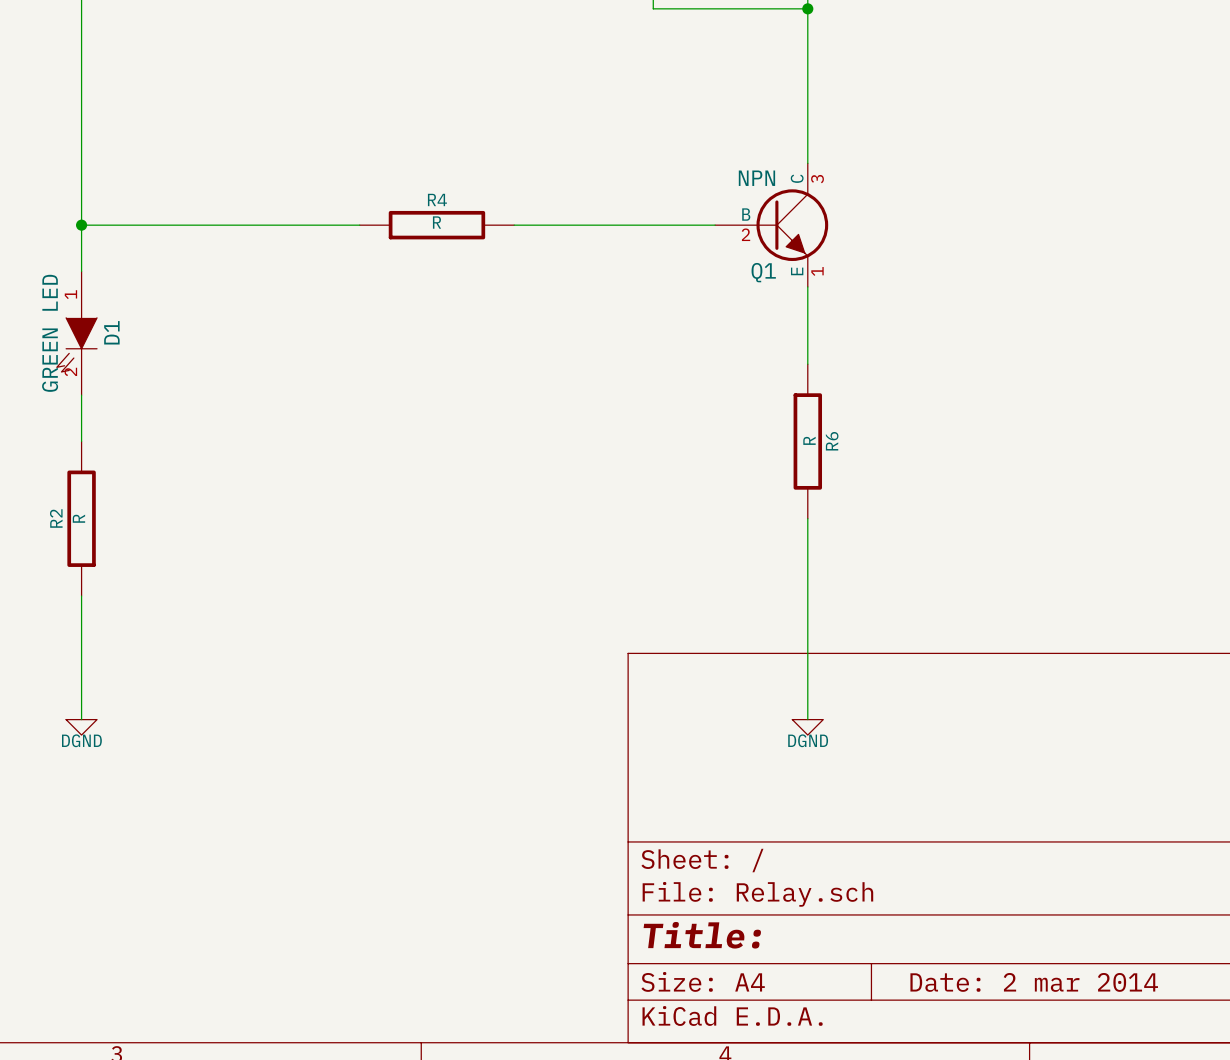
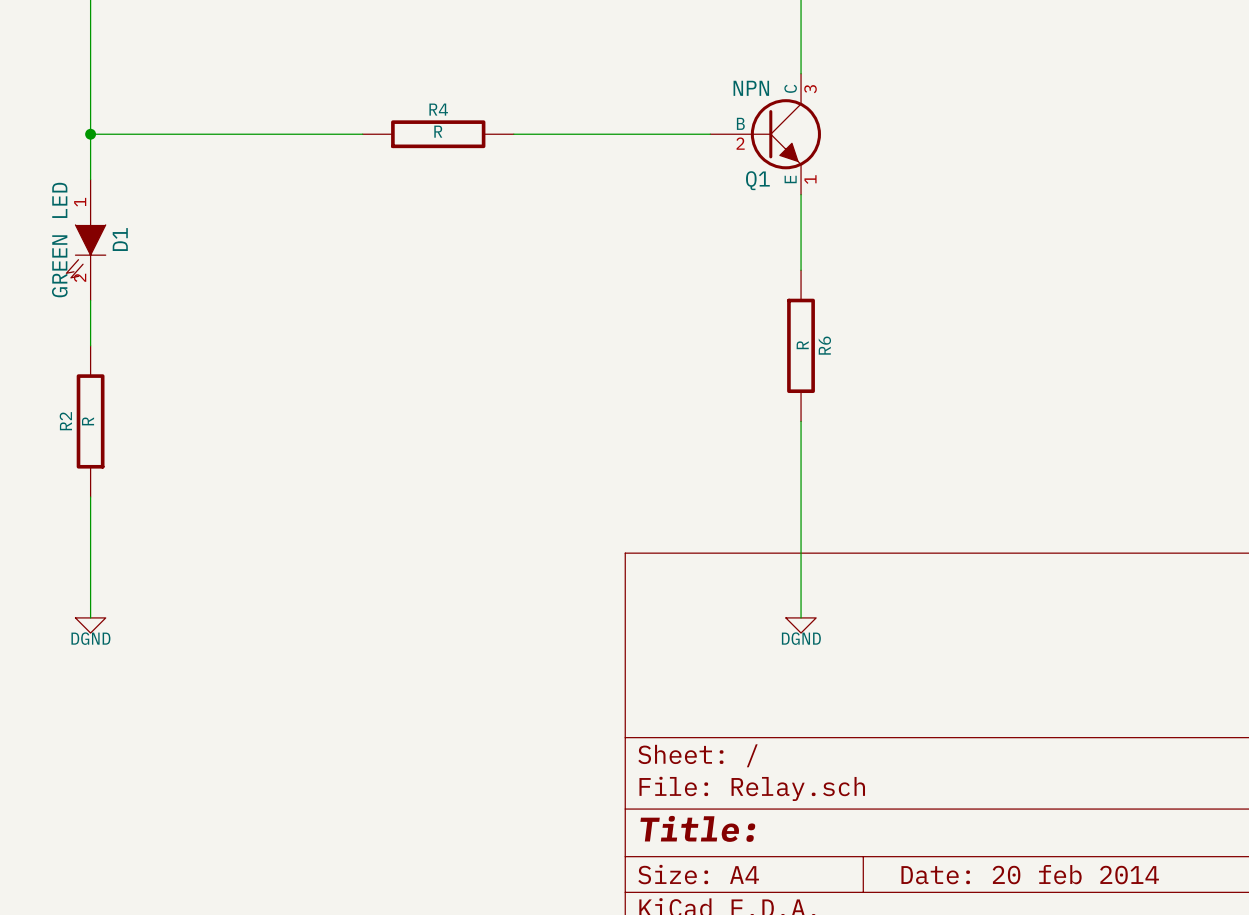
title block: Date: 2 mar 2014 (1034, 982) -> Date: 20 feb 2014 (1030, 874)

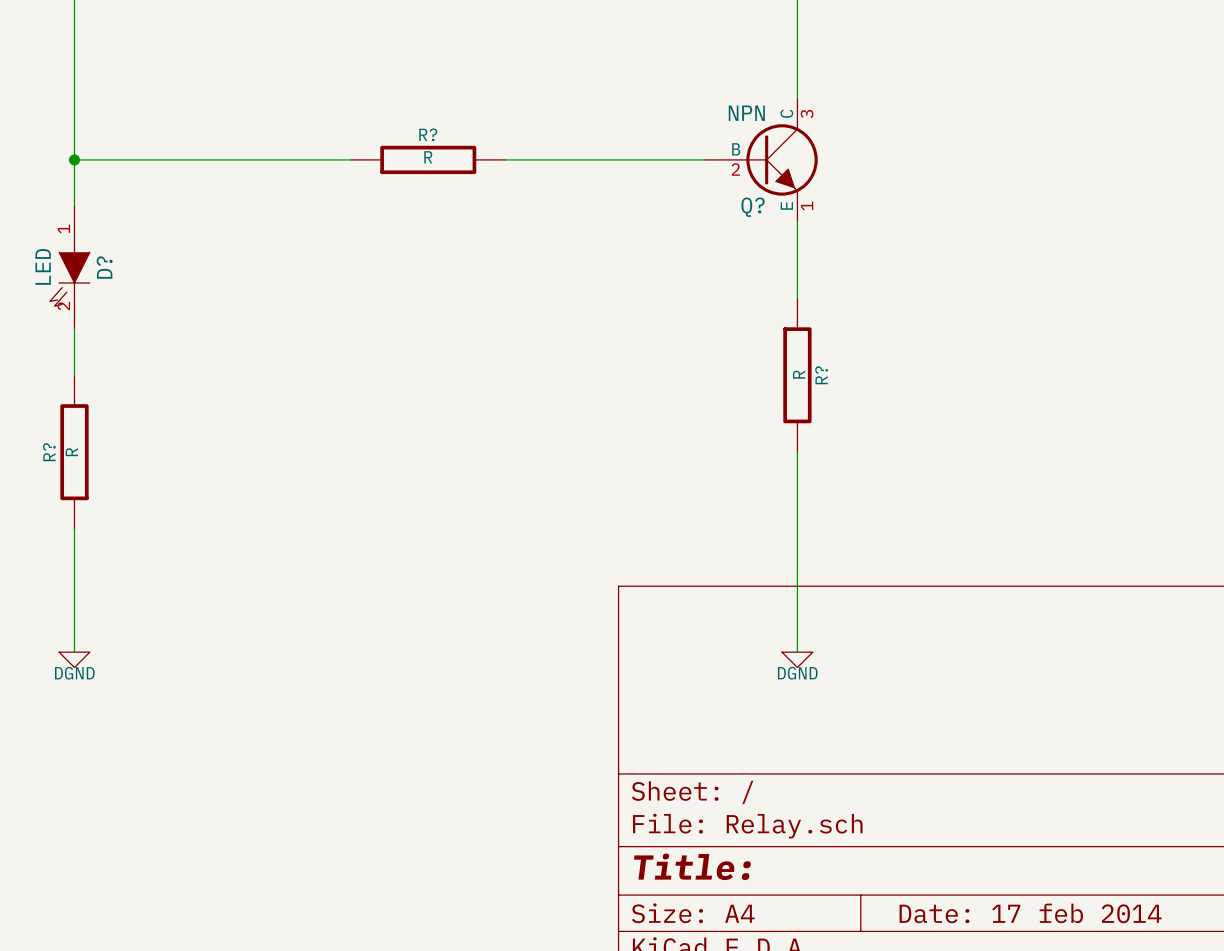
R4 name: R4 (438, 109) -> R? (428, 134)
Q1 name: Q1 (757, 180) -> Q? (753, 207)
D1 name: D1 (120, 239) -> D? (104, 267)
D1 value: GREEN LED (59, 240) -> LED (43, 266)
R6 name: R6 (824, 345) -> R? (821, 375)
R2 name: R2 (65, 421) -> R? (49, 452)
title block: Date: 20 feb 2014 (1030, 874) -> Date: 17 feb 2014 (1030, 913)

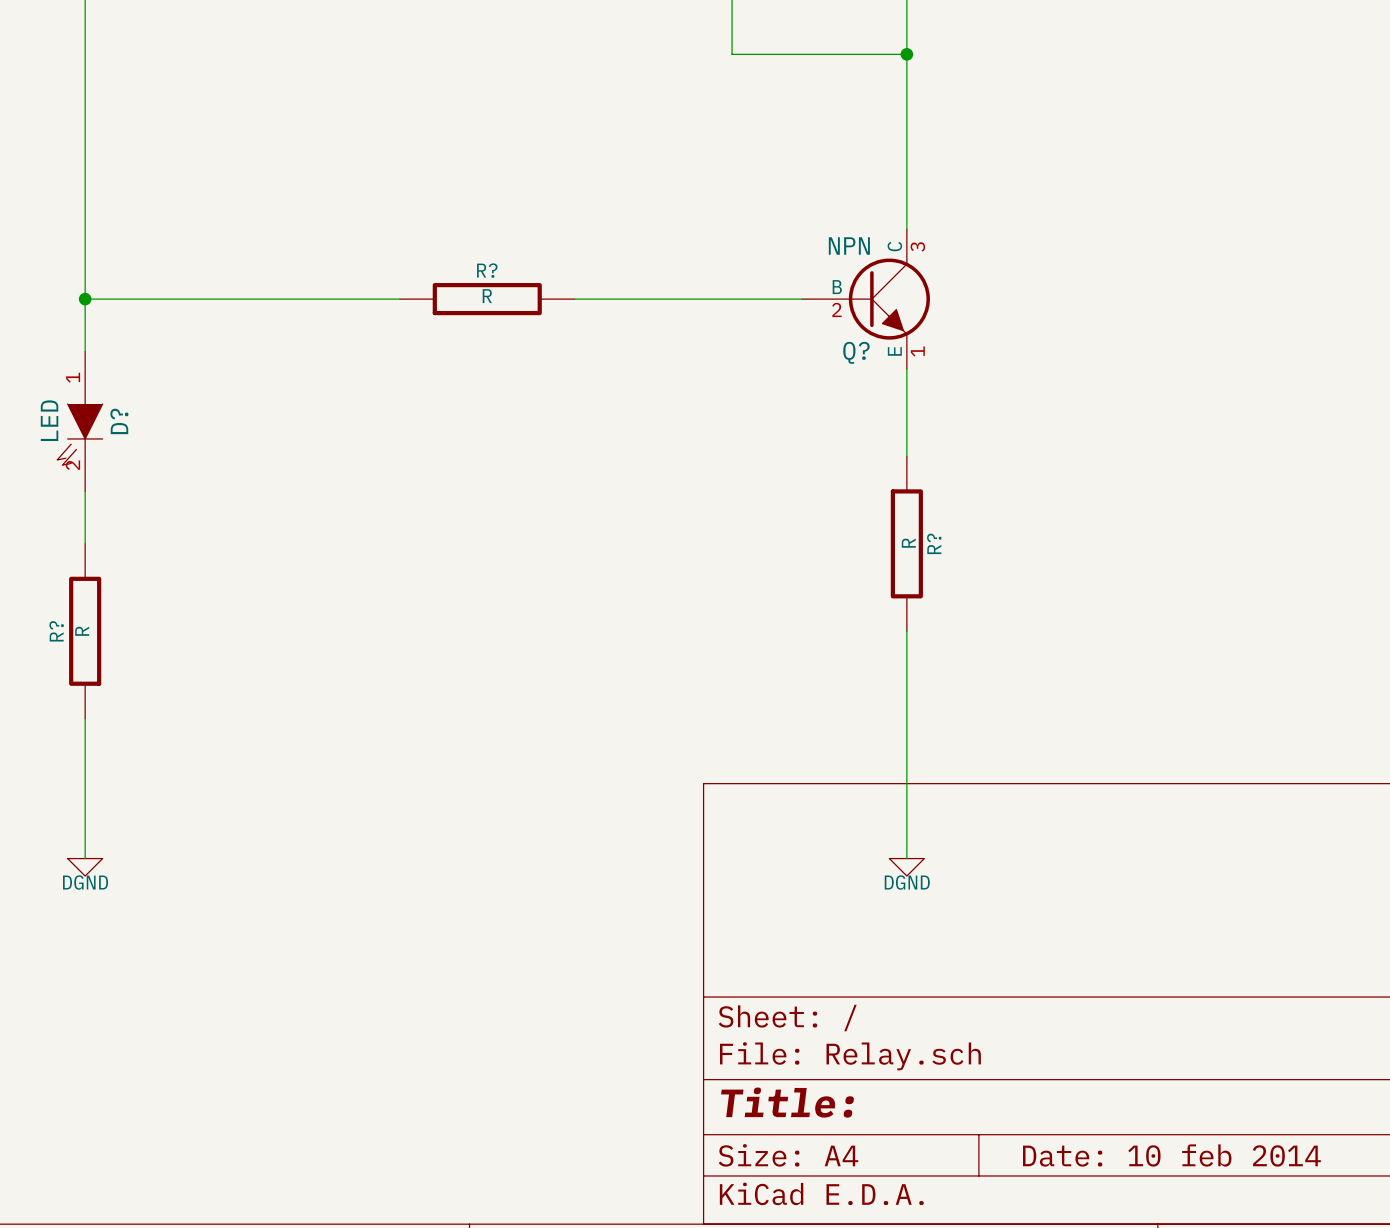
title block: Date: 17 feb 2014 (1030, 913) -> Date: 10 feb 2014 (1171, 1155)

